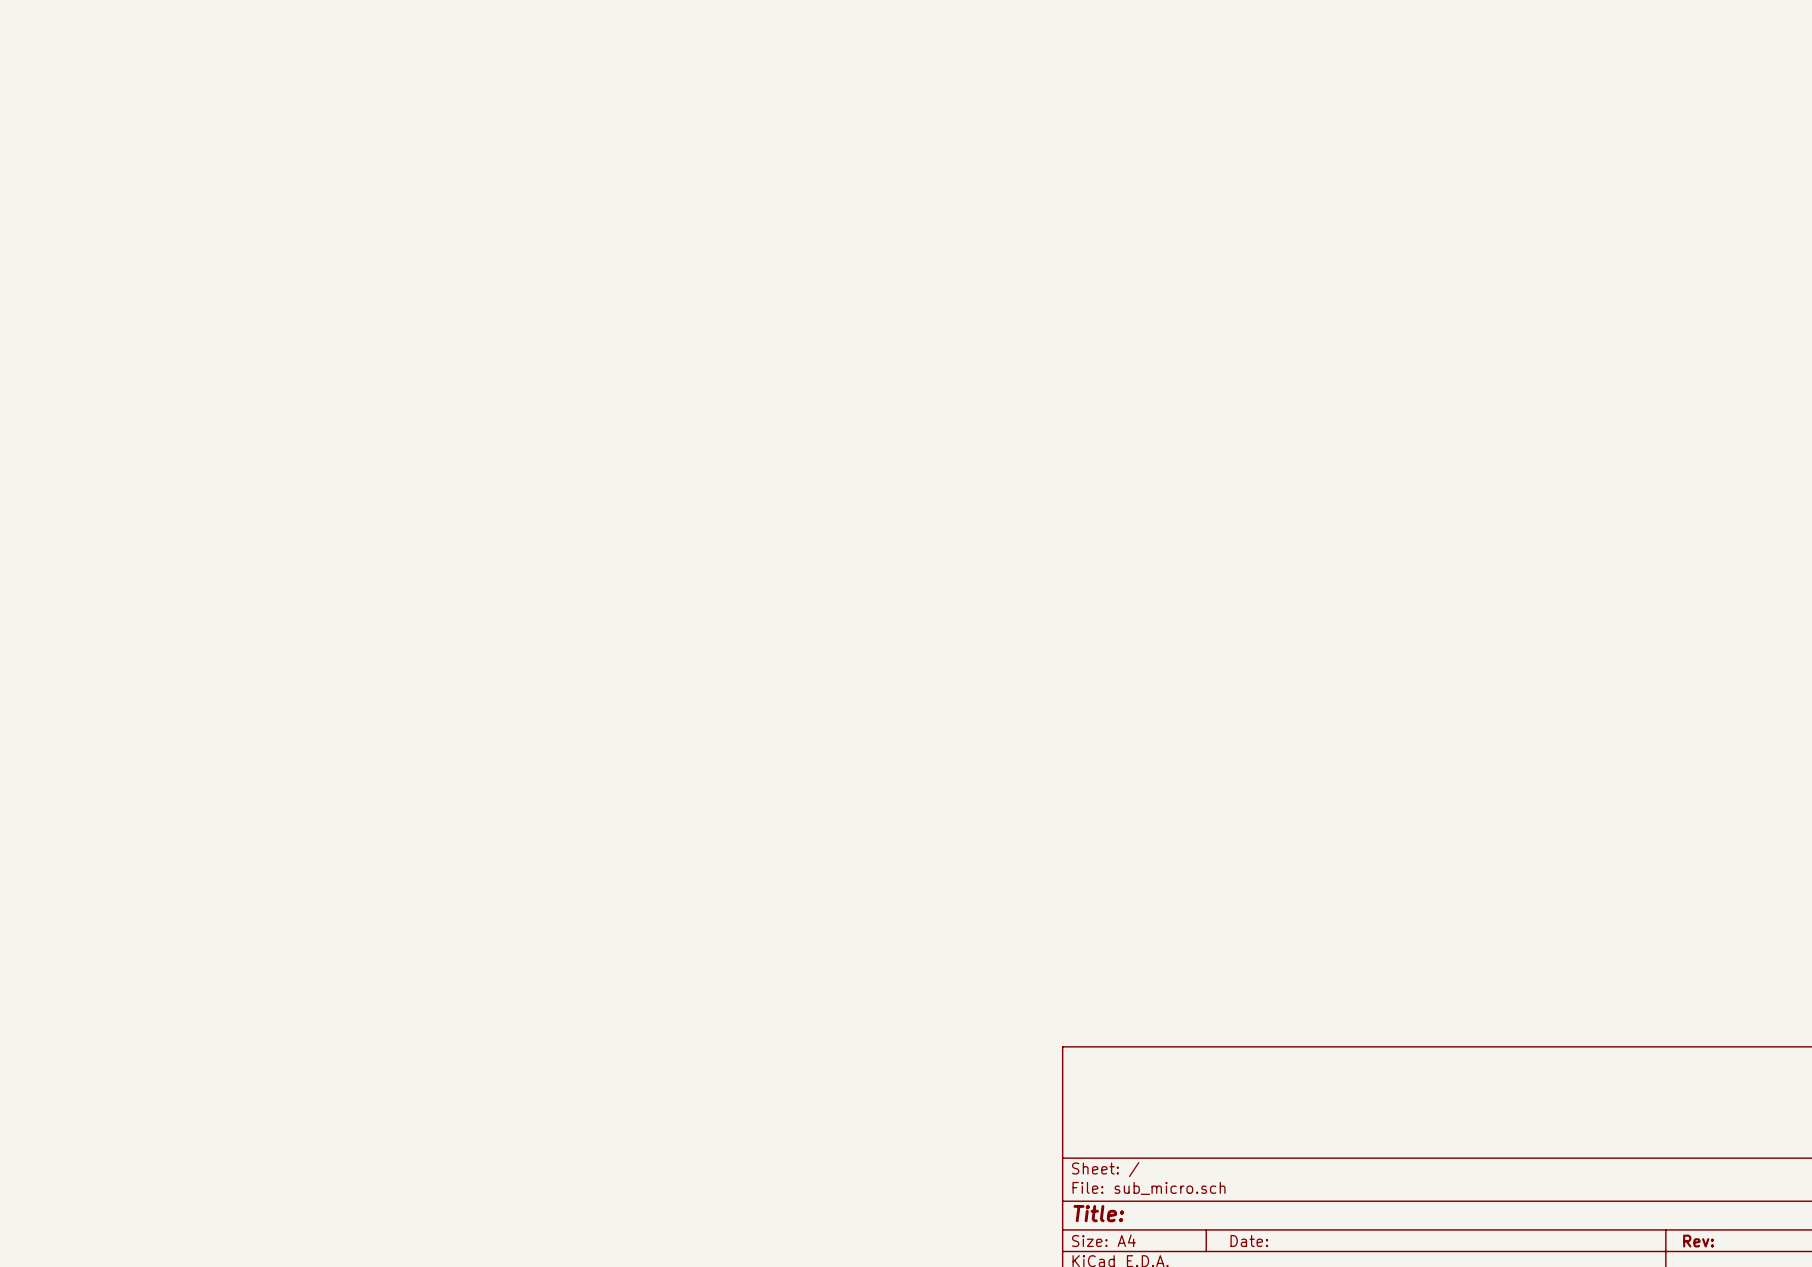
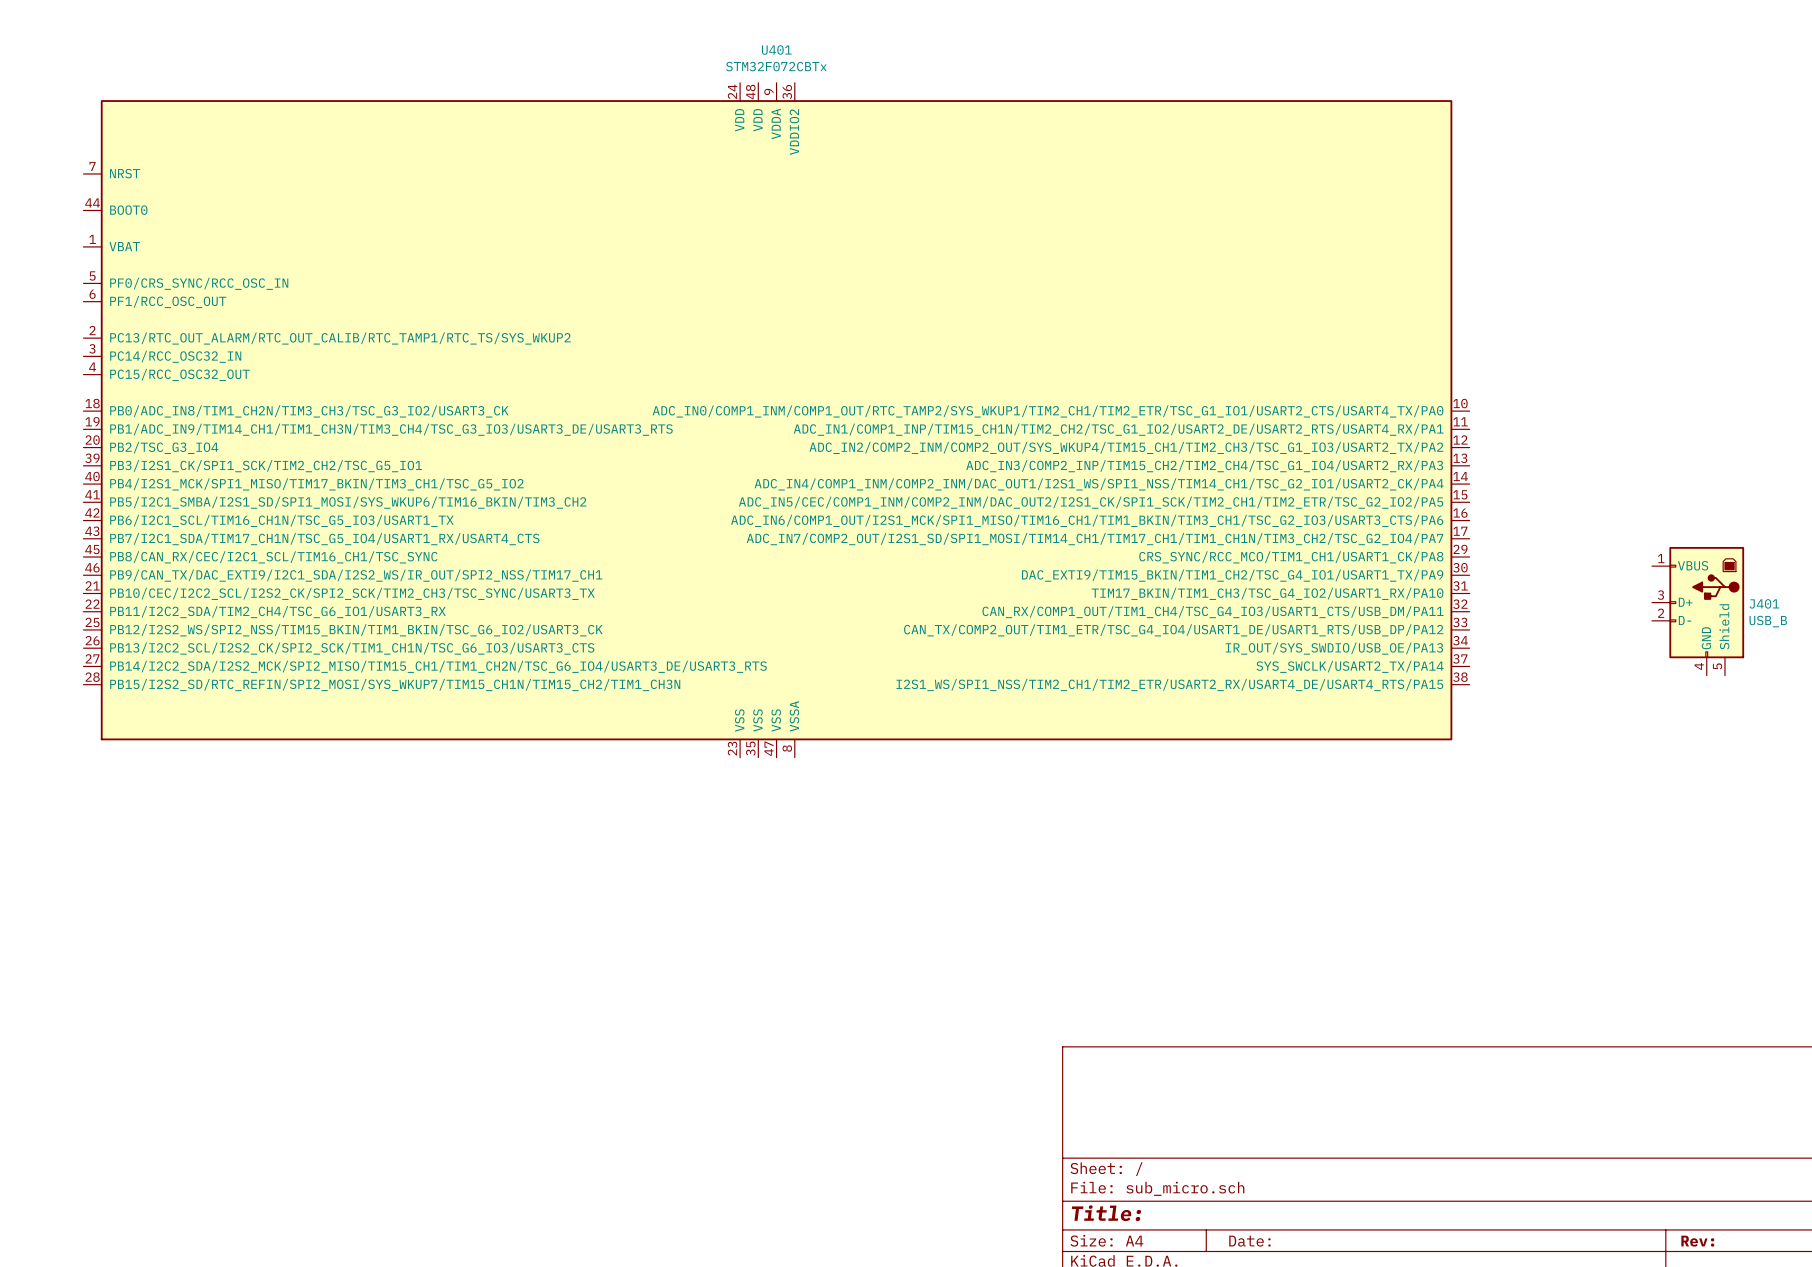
U401: none -> STM32F072CBTx (776, 420)
J401: none -> USB_B (1698, 611)

